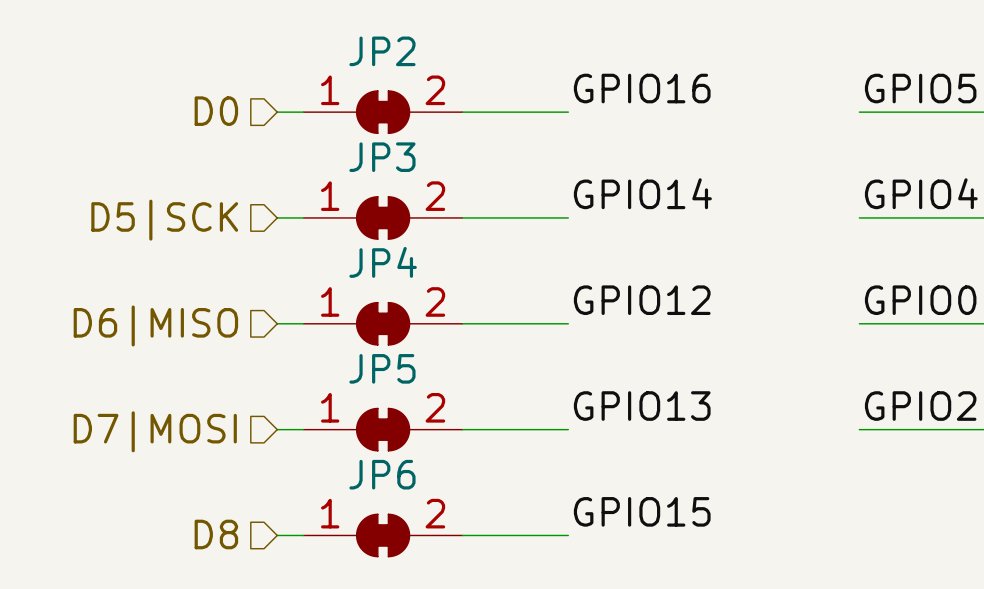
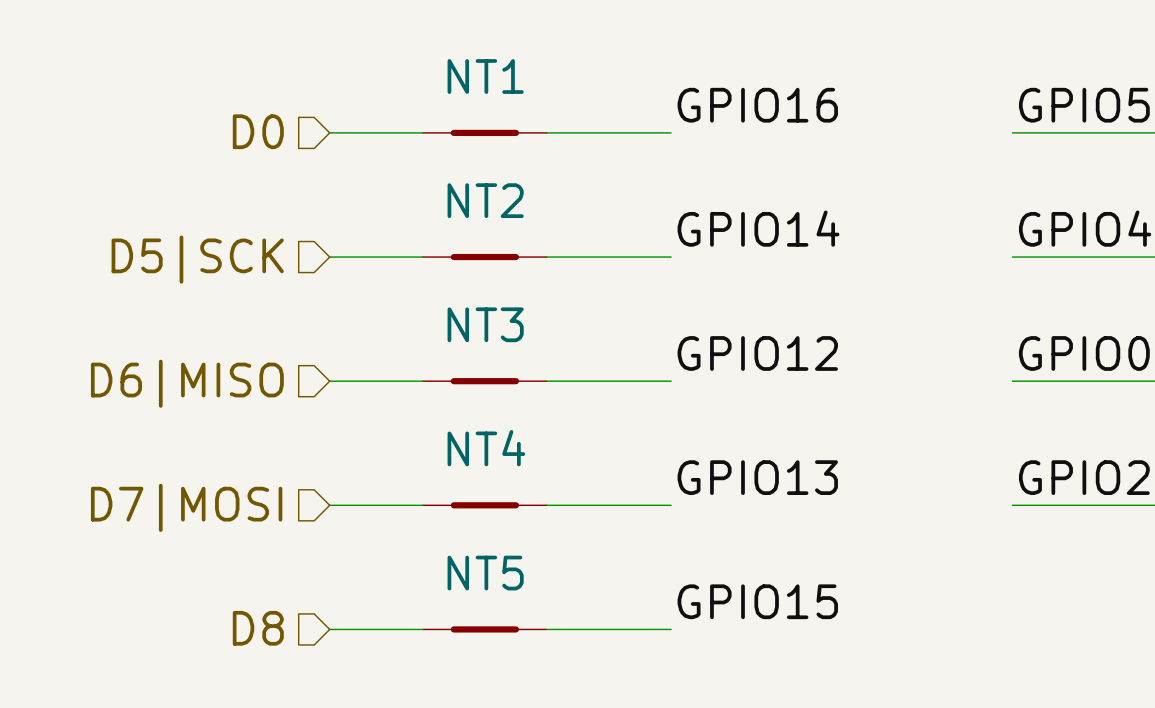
JP2: (383, 112) -> none
NT1: none -> (484, 132)
JP3: (383, 217) -> none
NT2: none -> (484, 257)
JP4: (383, 323) -> none
NT3: none -> (484, 381)
JP5: (383, 429) -> none
NT4: none -> (484, 505)
JP6: (383, 535) -> none
NT5: none -> (484, 629)

